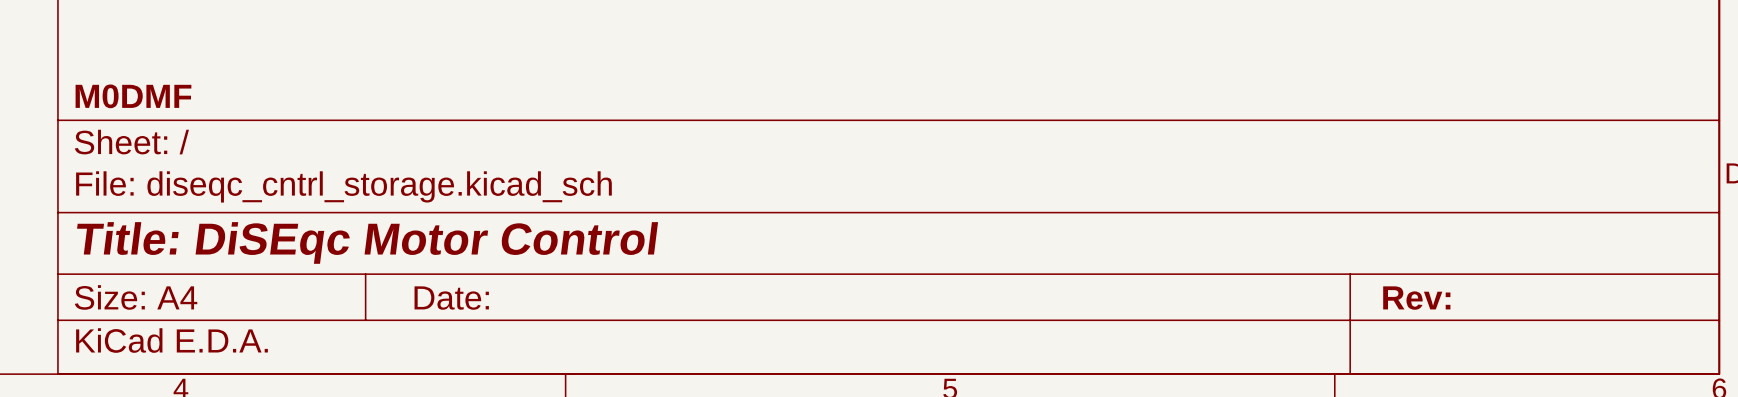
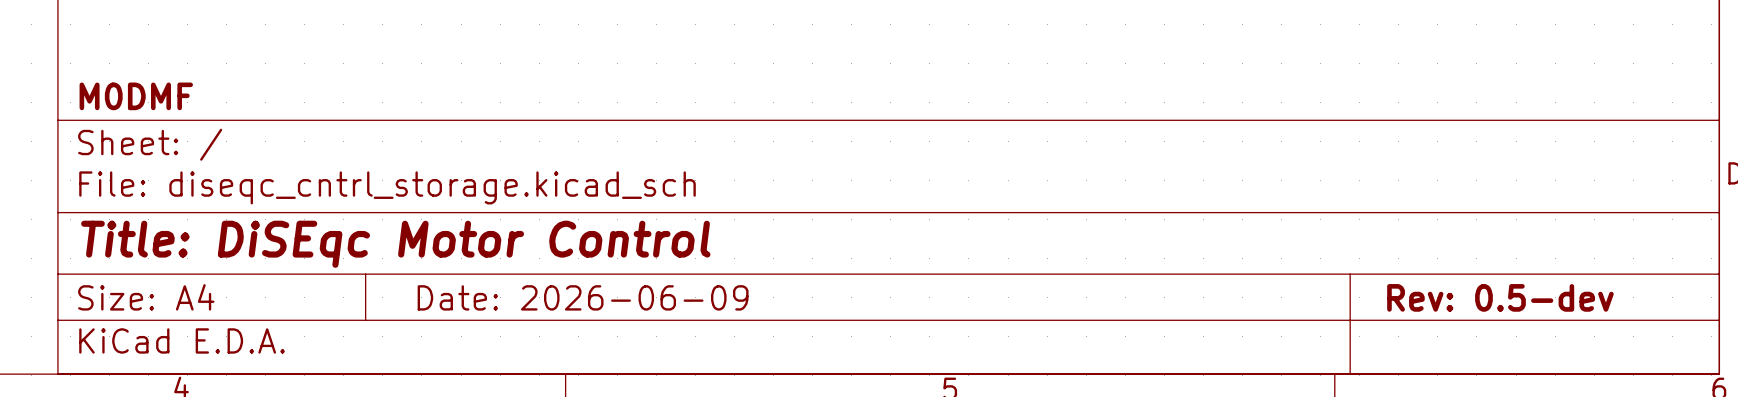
title block: Date: (451, 298) -> Date: 2026-06-09 (583, 297)
title block: Rev: (1416, 298) -> Rev: 0.5-dev (1500, 297)

